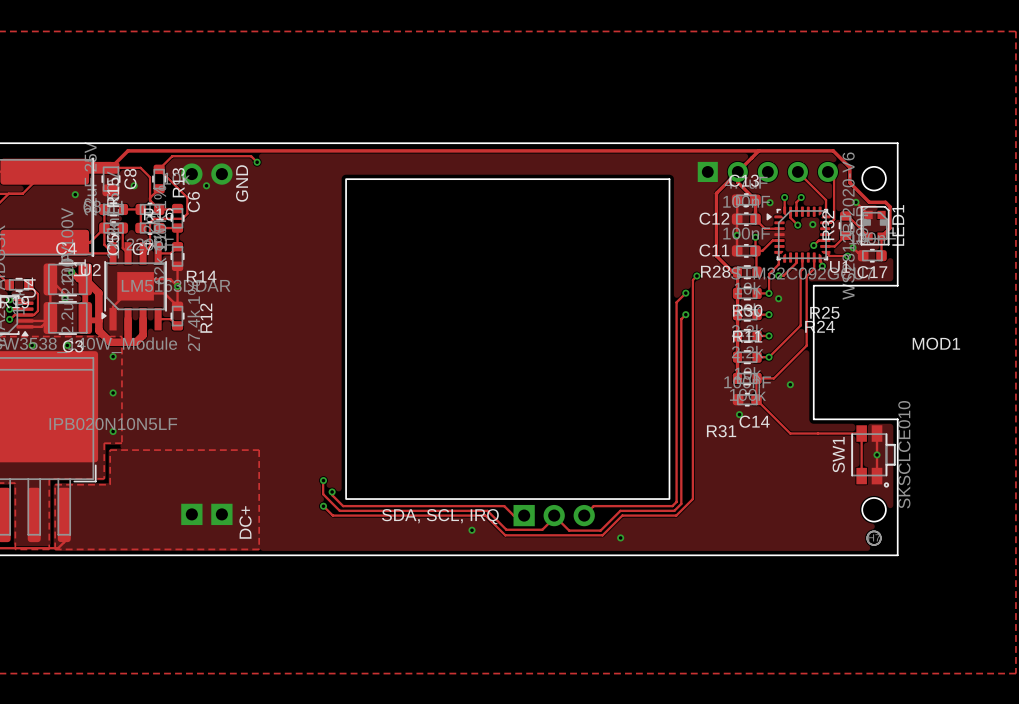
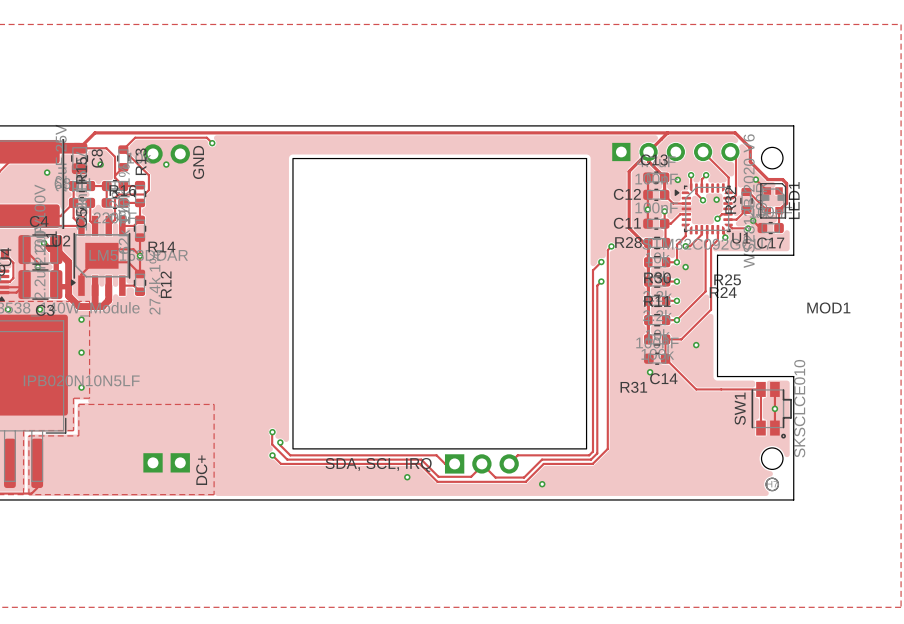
C6 name: C6 (193, 202) -> none
C7 name: C7 (142, 249) -> none

